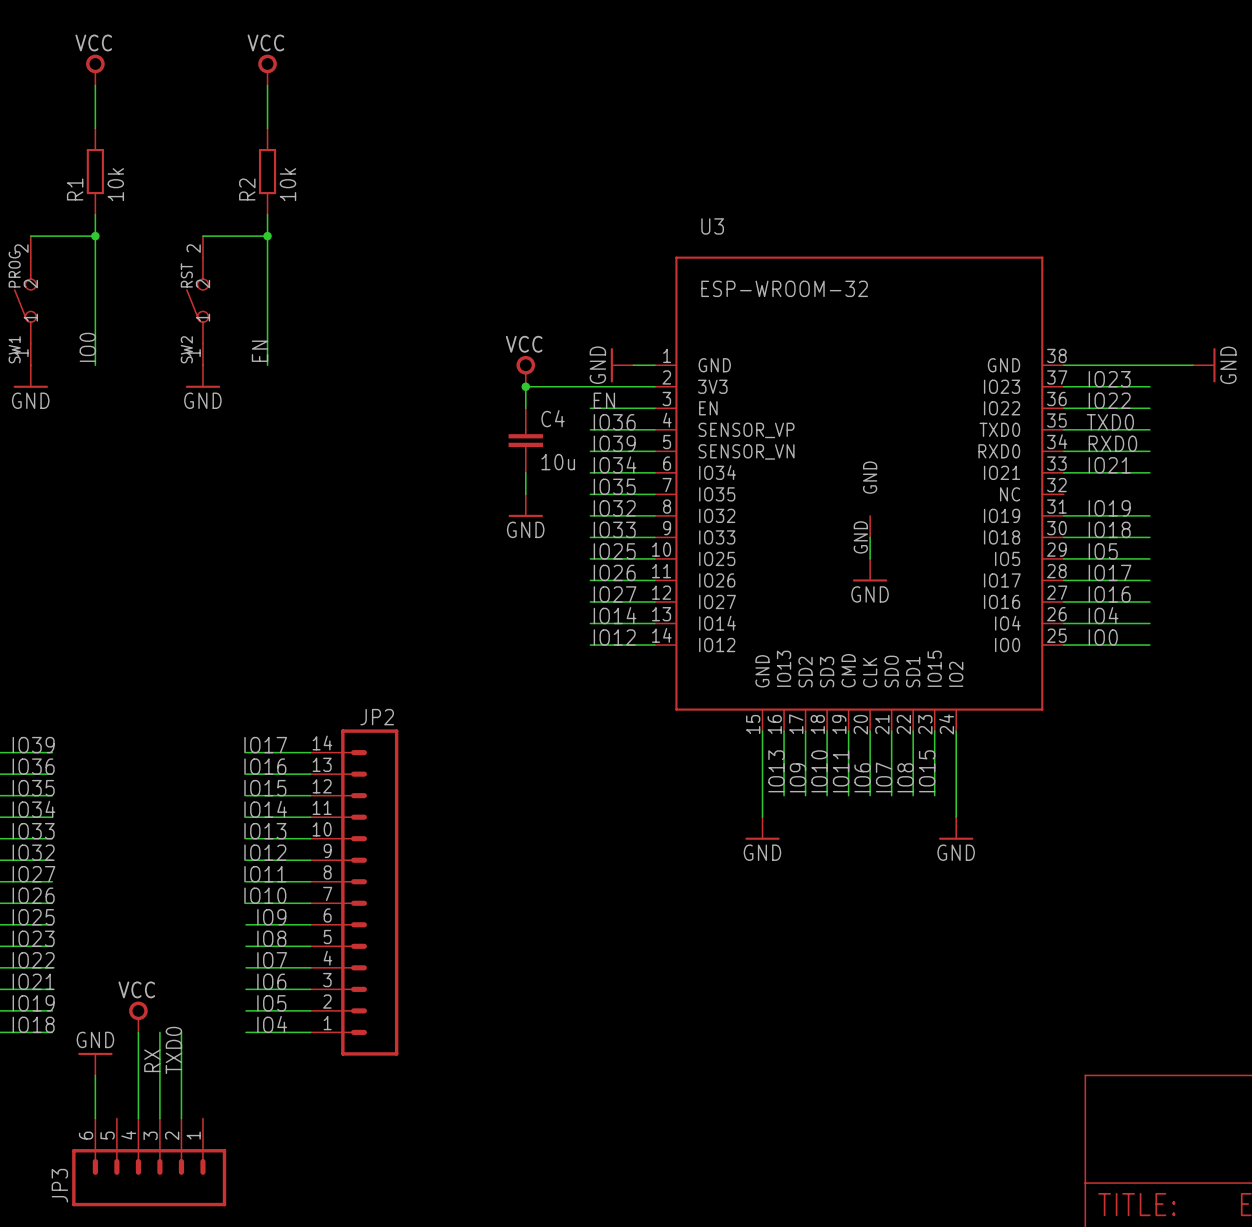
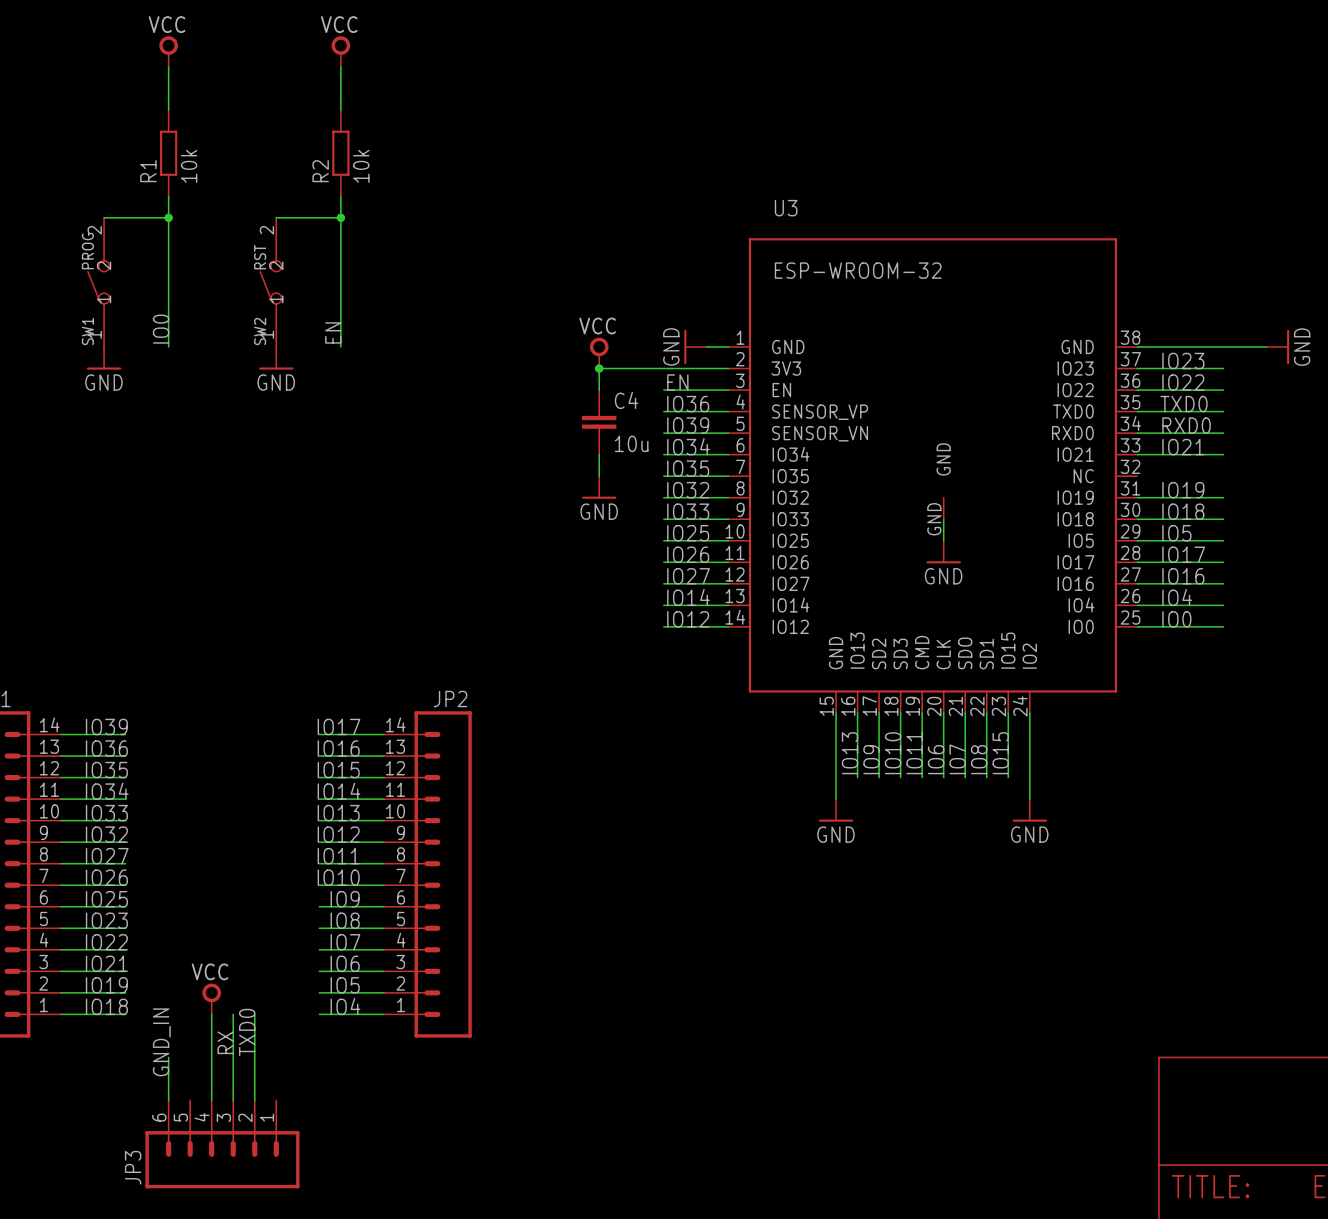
label: none -> GND_IN (161, 1042)
power symbol: GND (95, 1064) -> none

